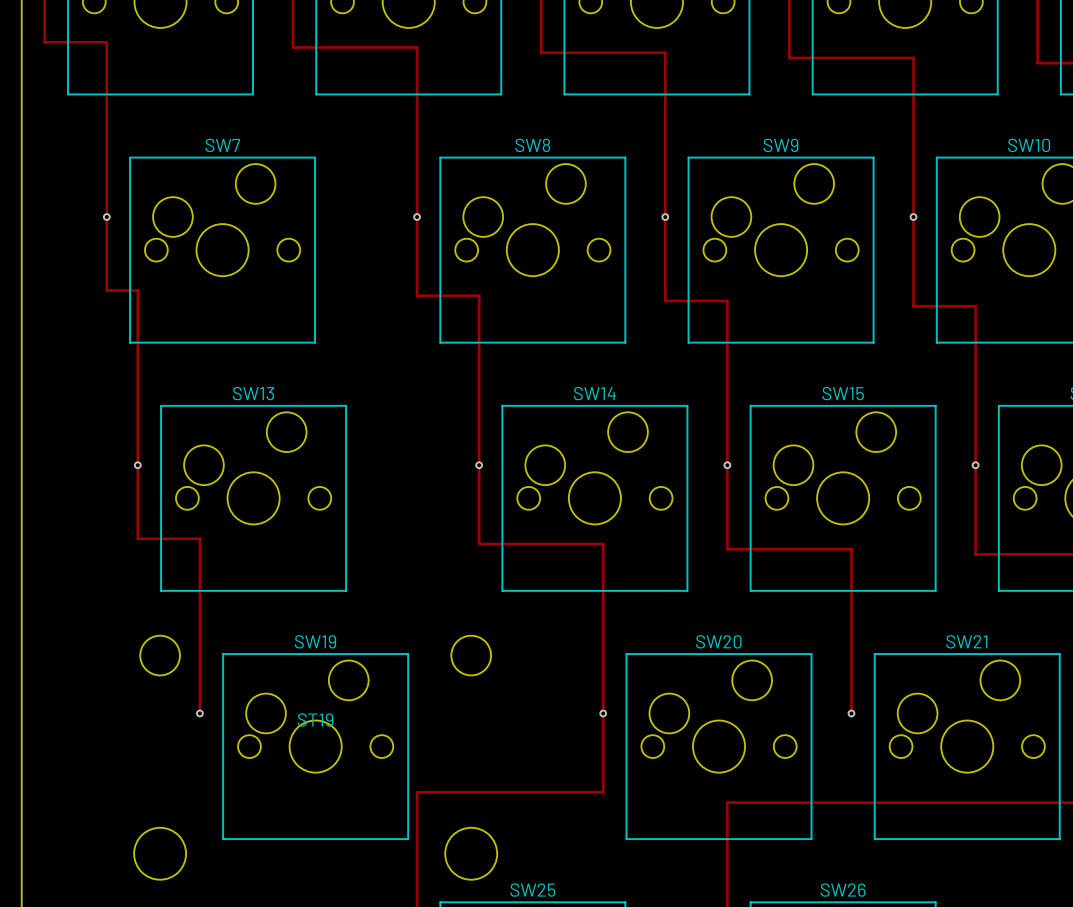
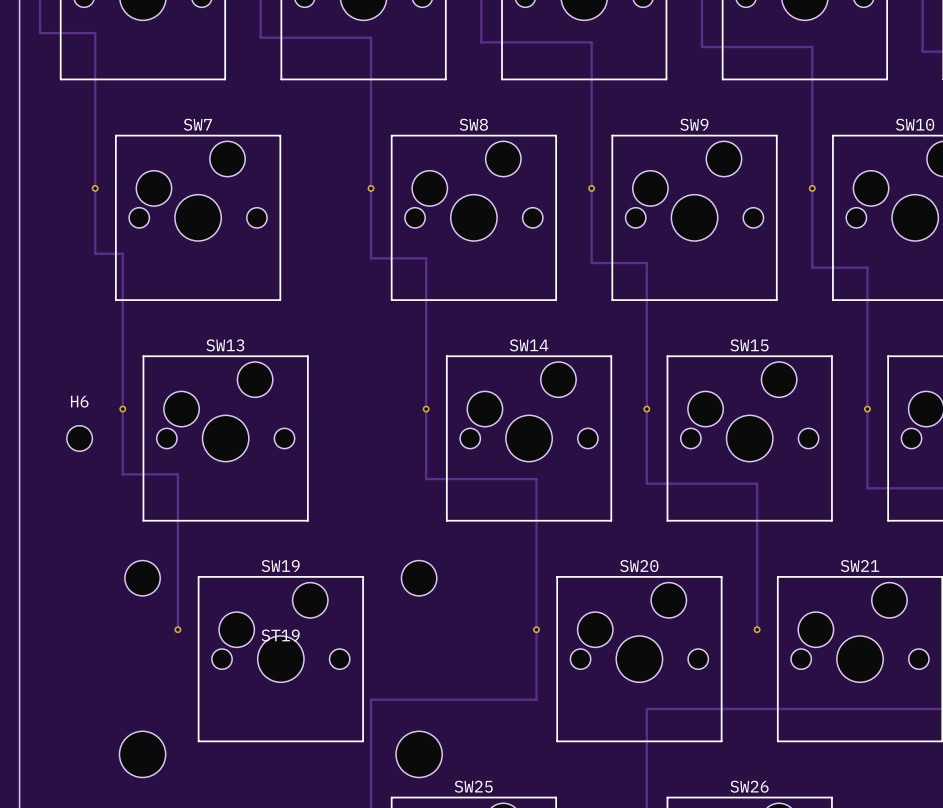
H6: none -> (79, 438)

